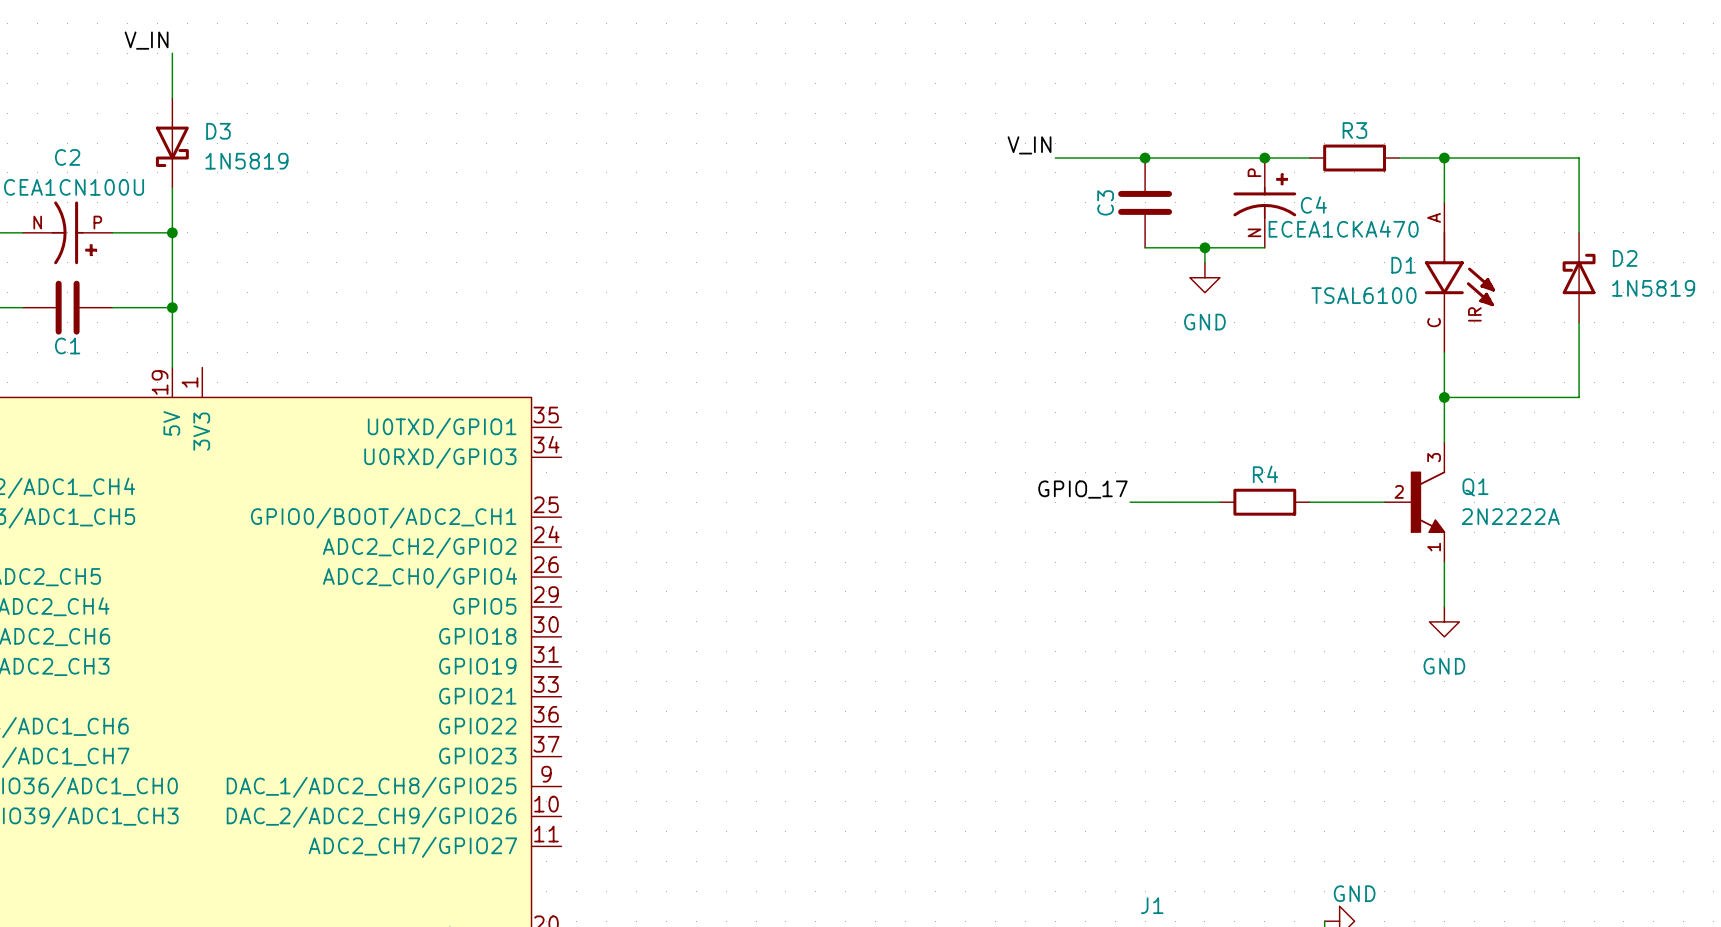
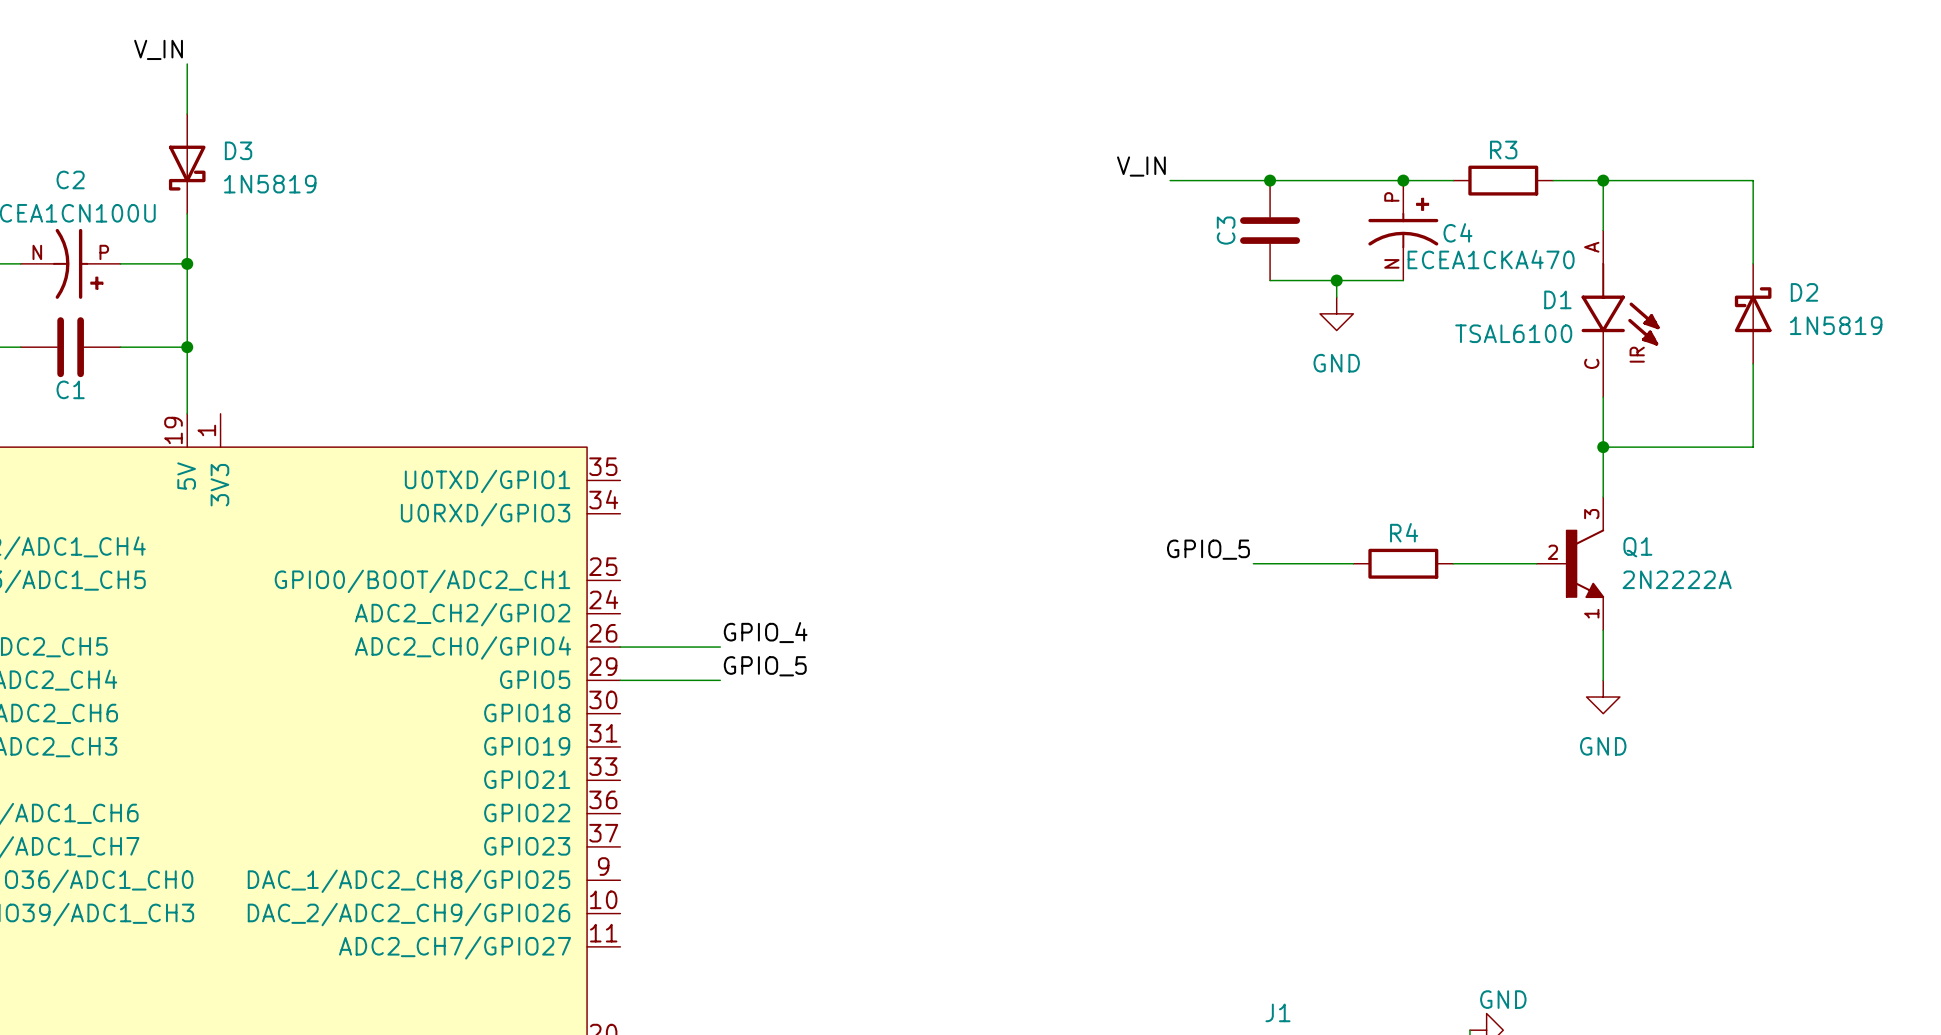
label: GPIO_17 (1082, 489) -> GPIO_5 (1208, 549)
label: none -> GPIO_4 (765, 632)
wire: none -> (620, 647) (720, 647)
label: none -> GPIO_5 (765, 666)
wire: none -> (620, 680) (720, 680)

